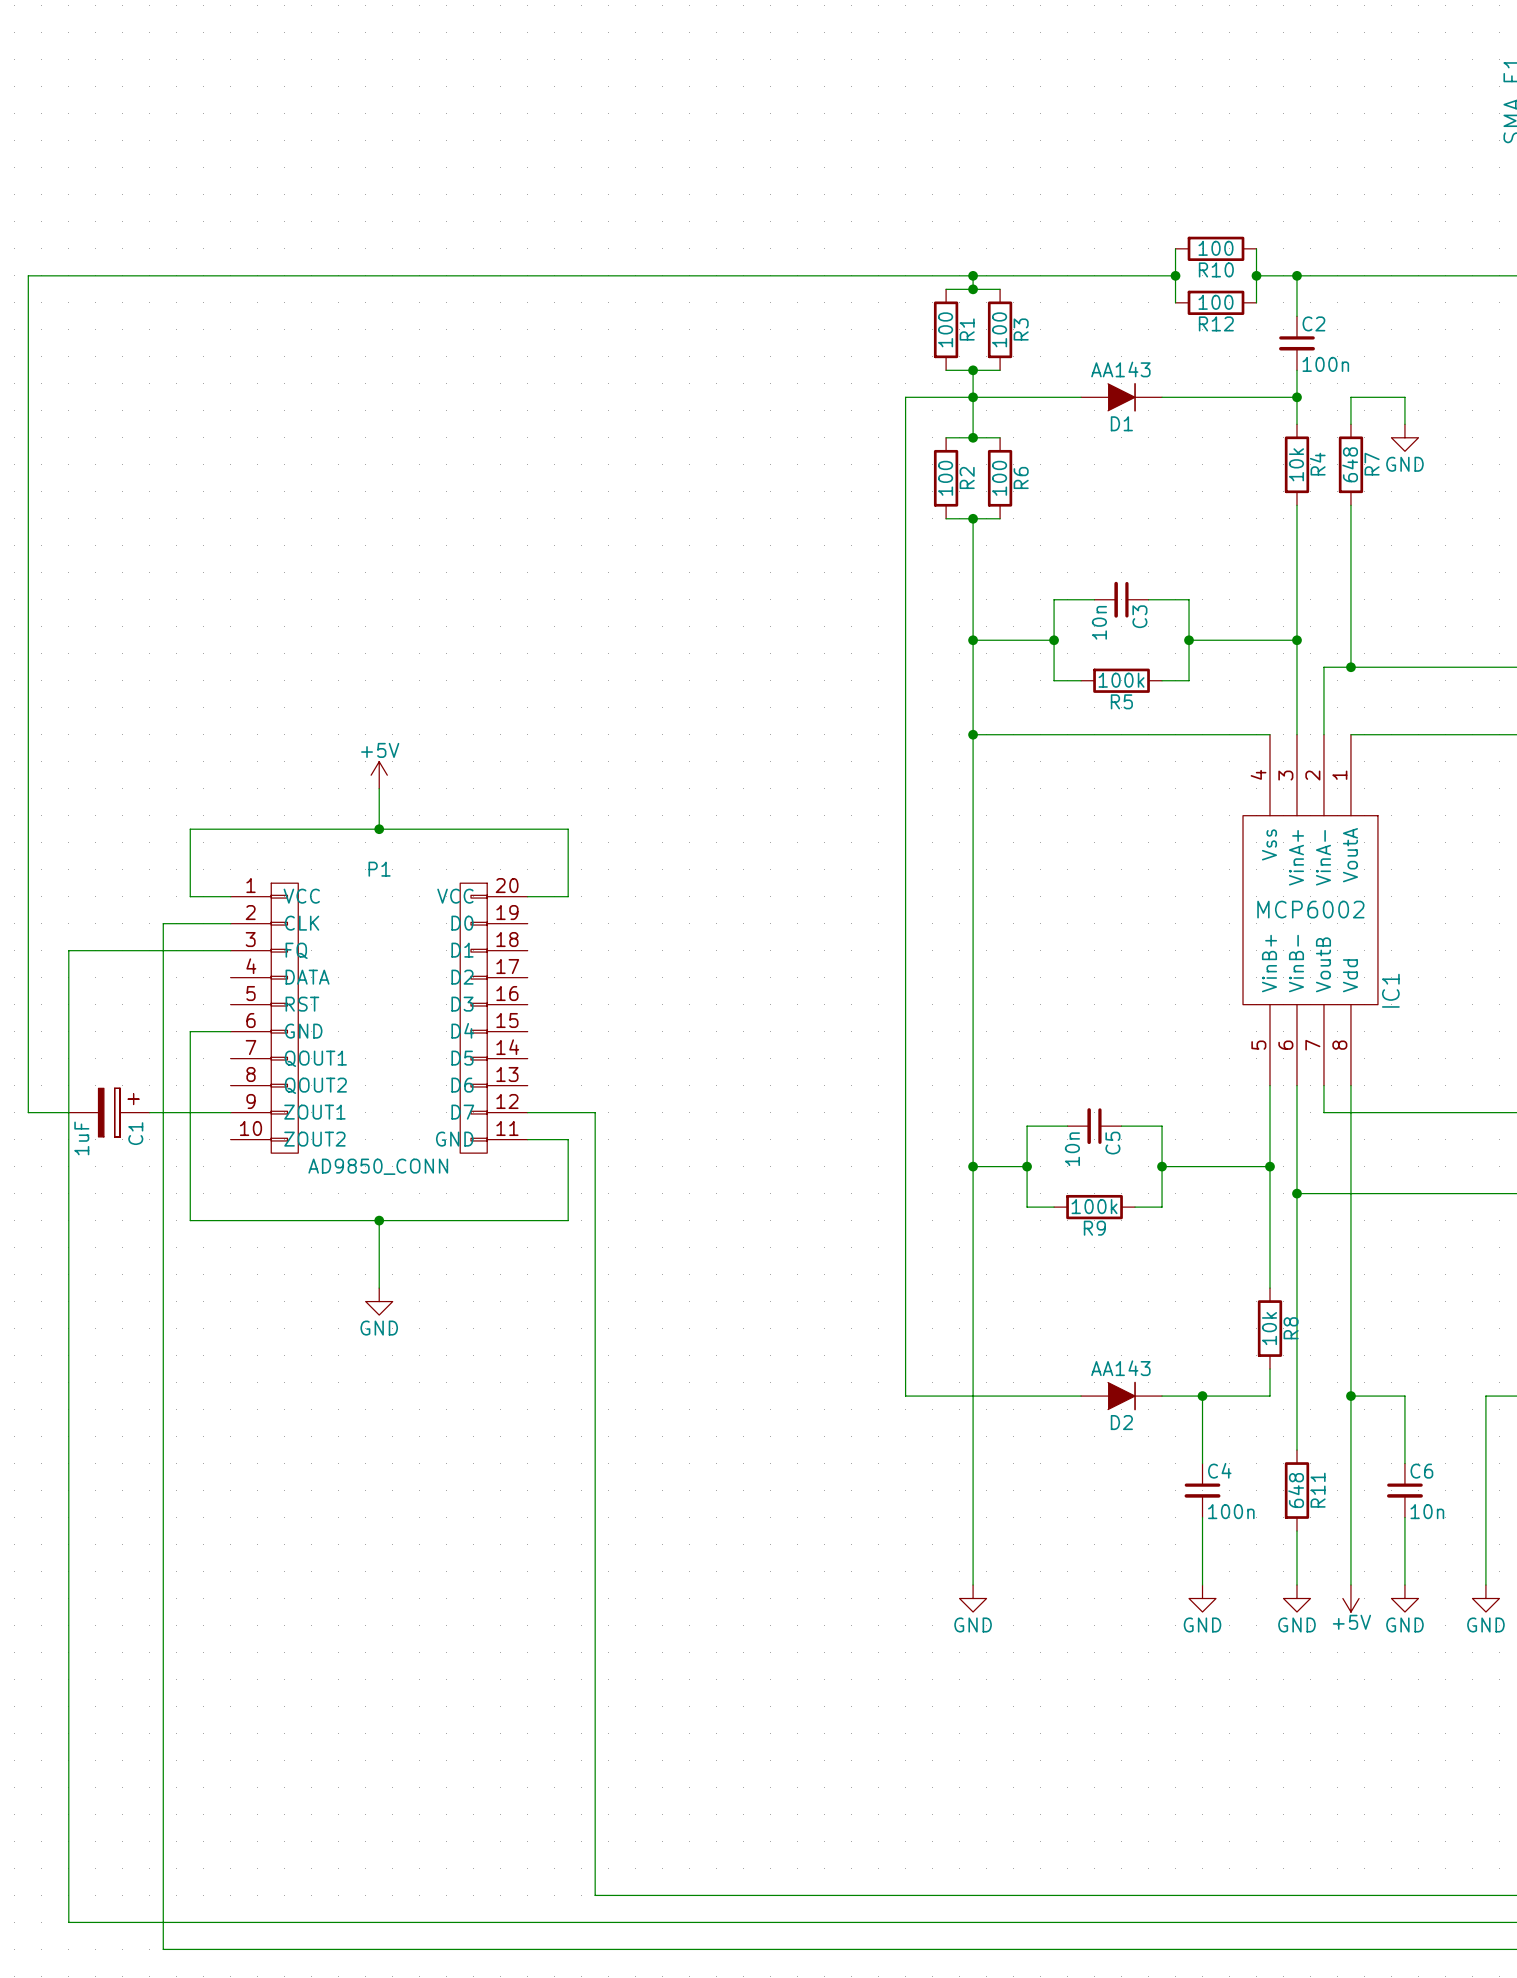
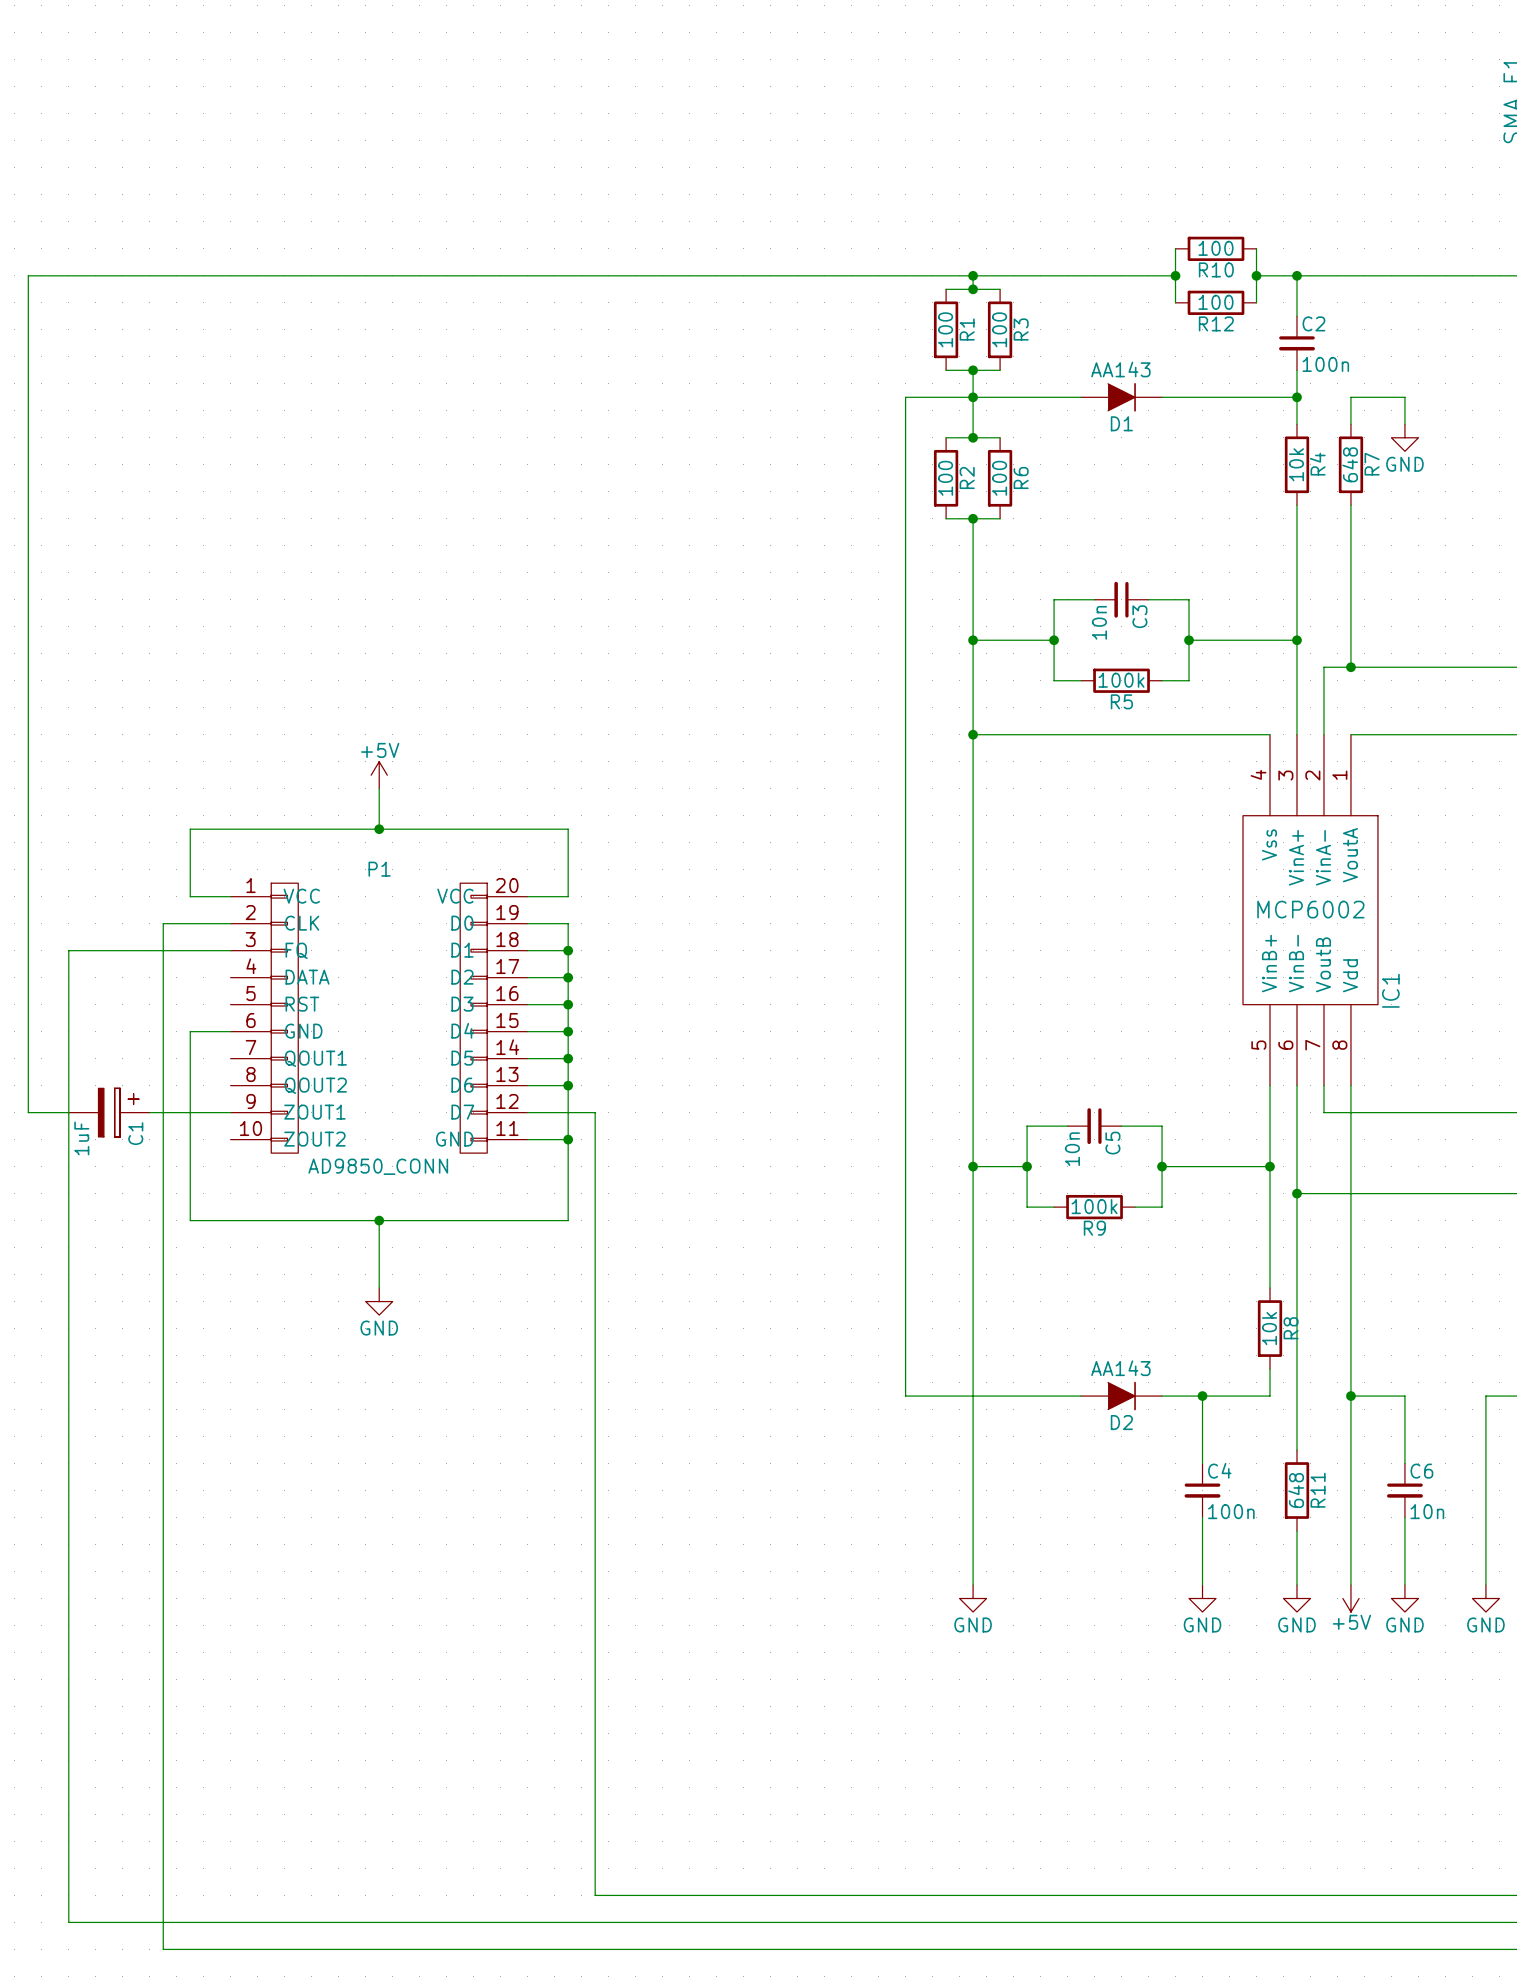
wire: none -> (527, 923) (568, 923) (568, 1139)
wire: none -> (527, 950) (568, 950)
junction: none -> (568, 950)
wire: none -> (527, 977) (568, 977)
junction: none -> (568, 977)
wire: none -> (527, 1004) (568, 1004)
junction: none -> (568, 1004)
wire: none -> (527, 1031) (568, 1031)
junction: none -> (568, 1031)
wire: none -> (527, 1058) (568, 1058)
junction: none -> (568, 1058)
wire: none -> (527, 1085) (568, 1085)
junction: none -> (568, 1085)
junction: none -> (568, 1139)

